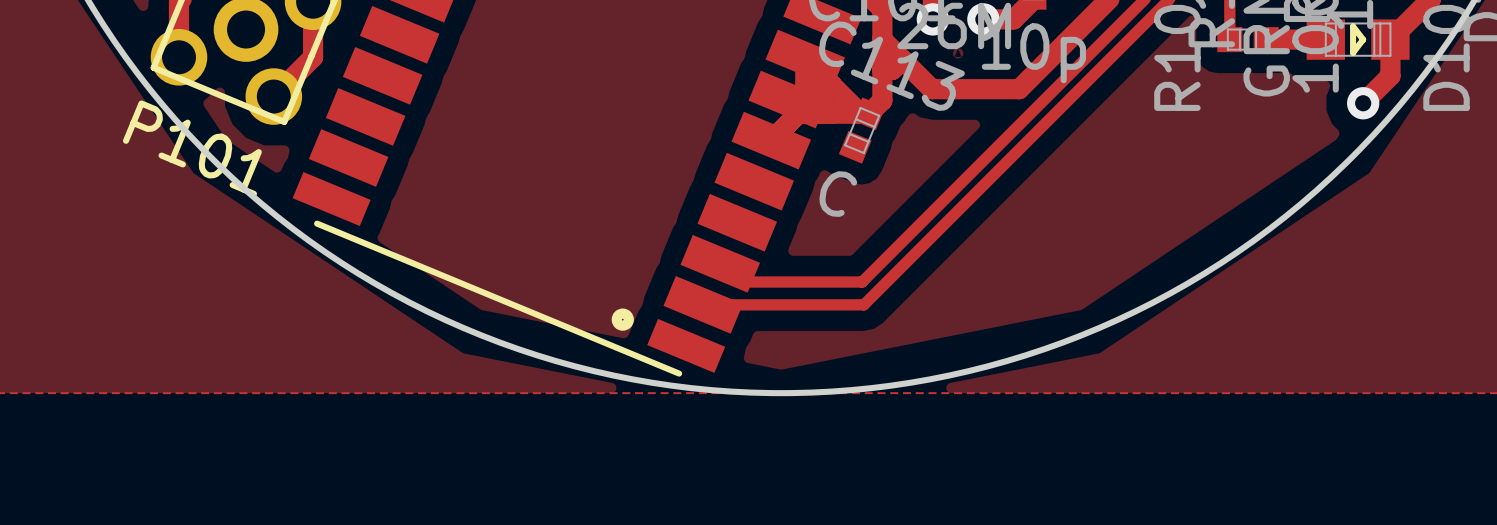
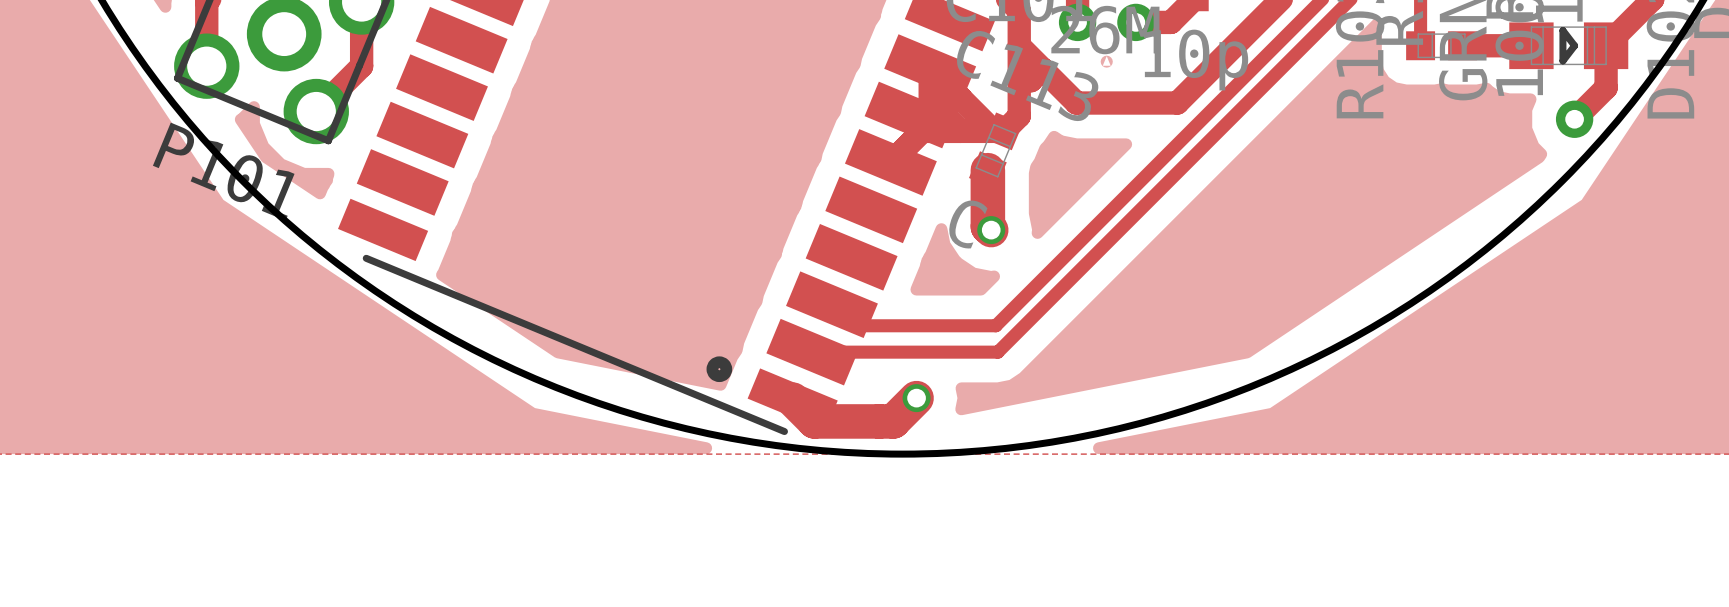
track: none -> (987, 170) (987, 226) (991, 230)
via: none -> (991, 230)
track: none -> (916, 398) (893, 421) (814, 421) (792, 399)
via: none -> (916, 398)

